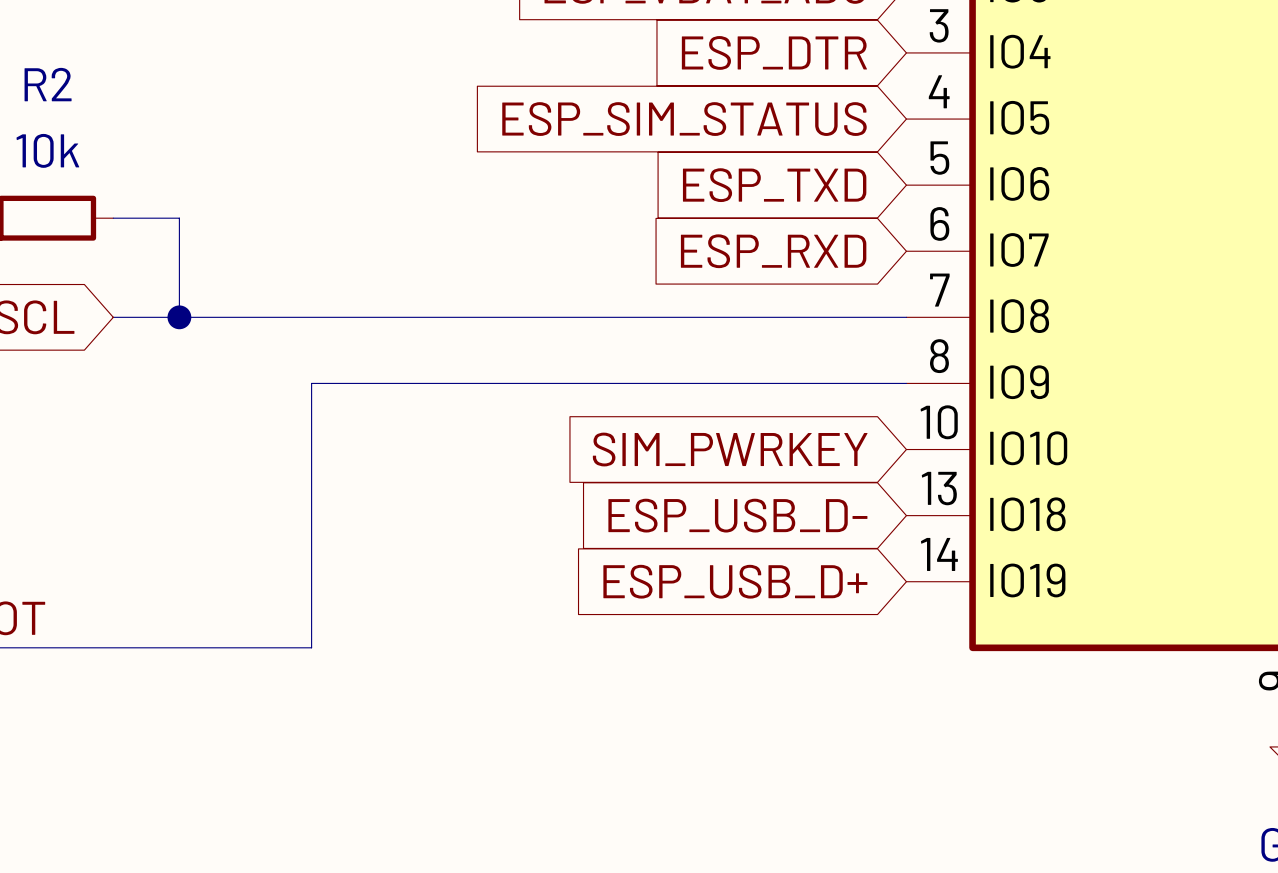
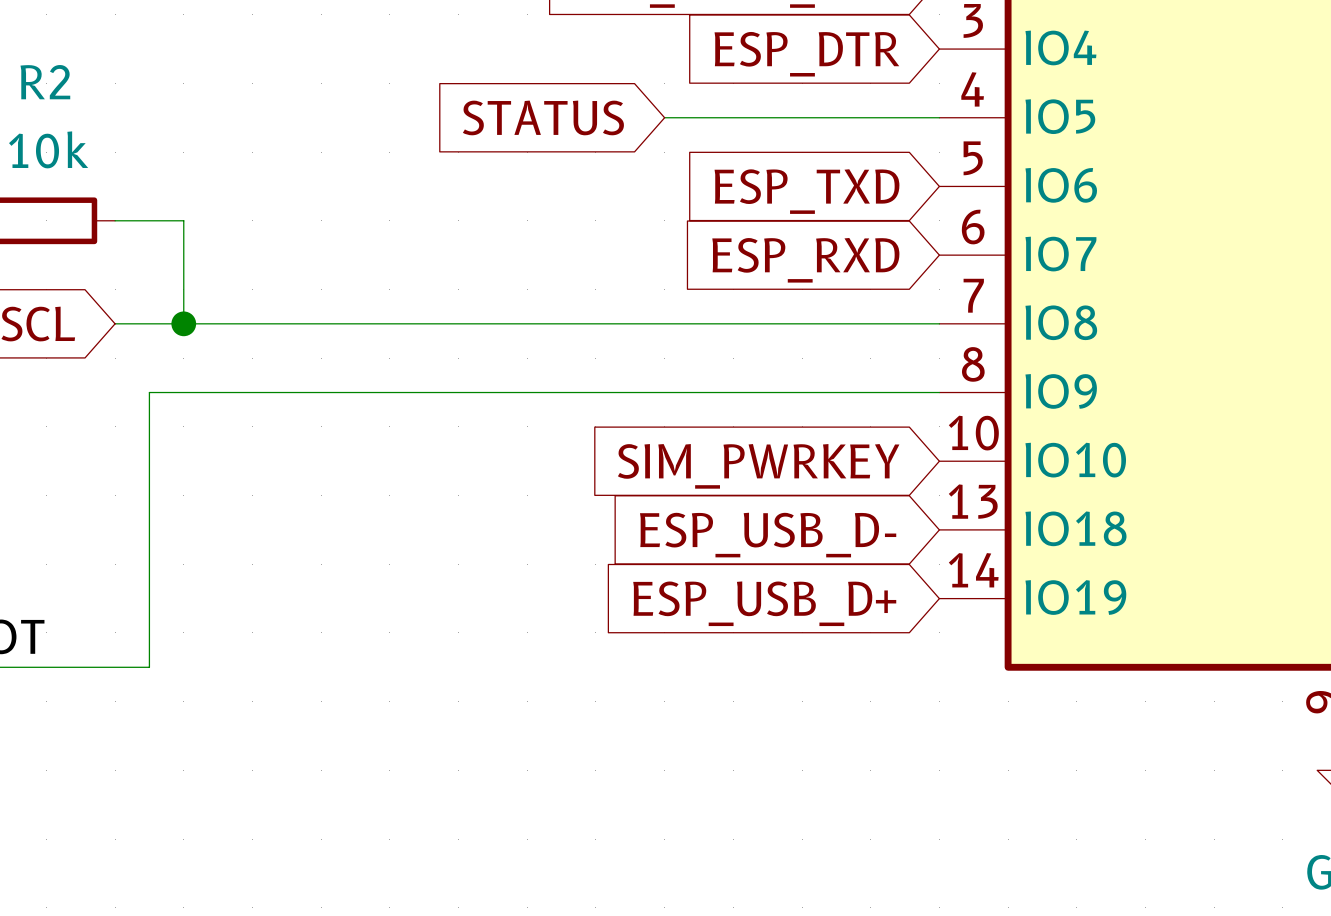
global label: none -> STATUS (543, 117)
wire: none -> (664, 117) (939, 117)
global label: ESP_SIM_STATUS (684, 119) -> none
wire: (311, 383) (311, 647) (146, 647) -> (321, 392) (149, 392) (149, 667)

